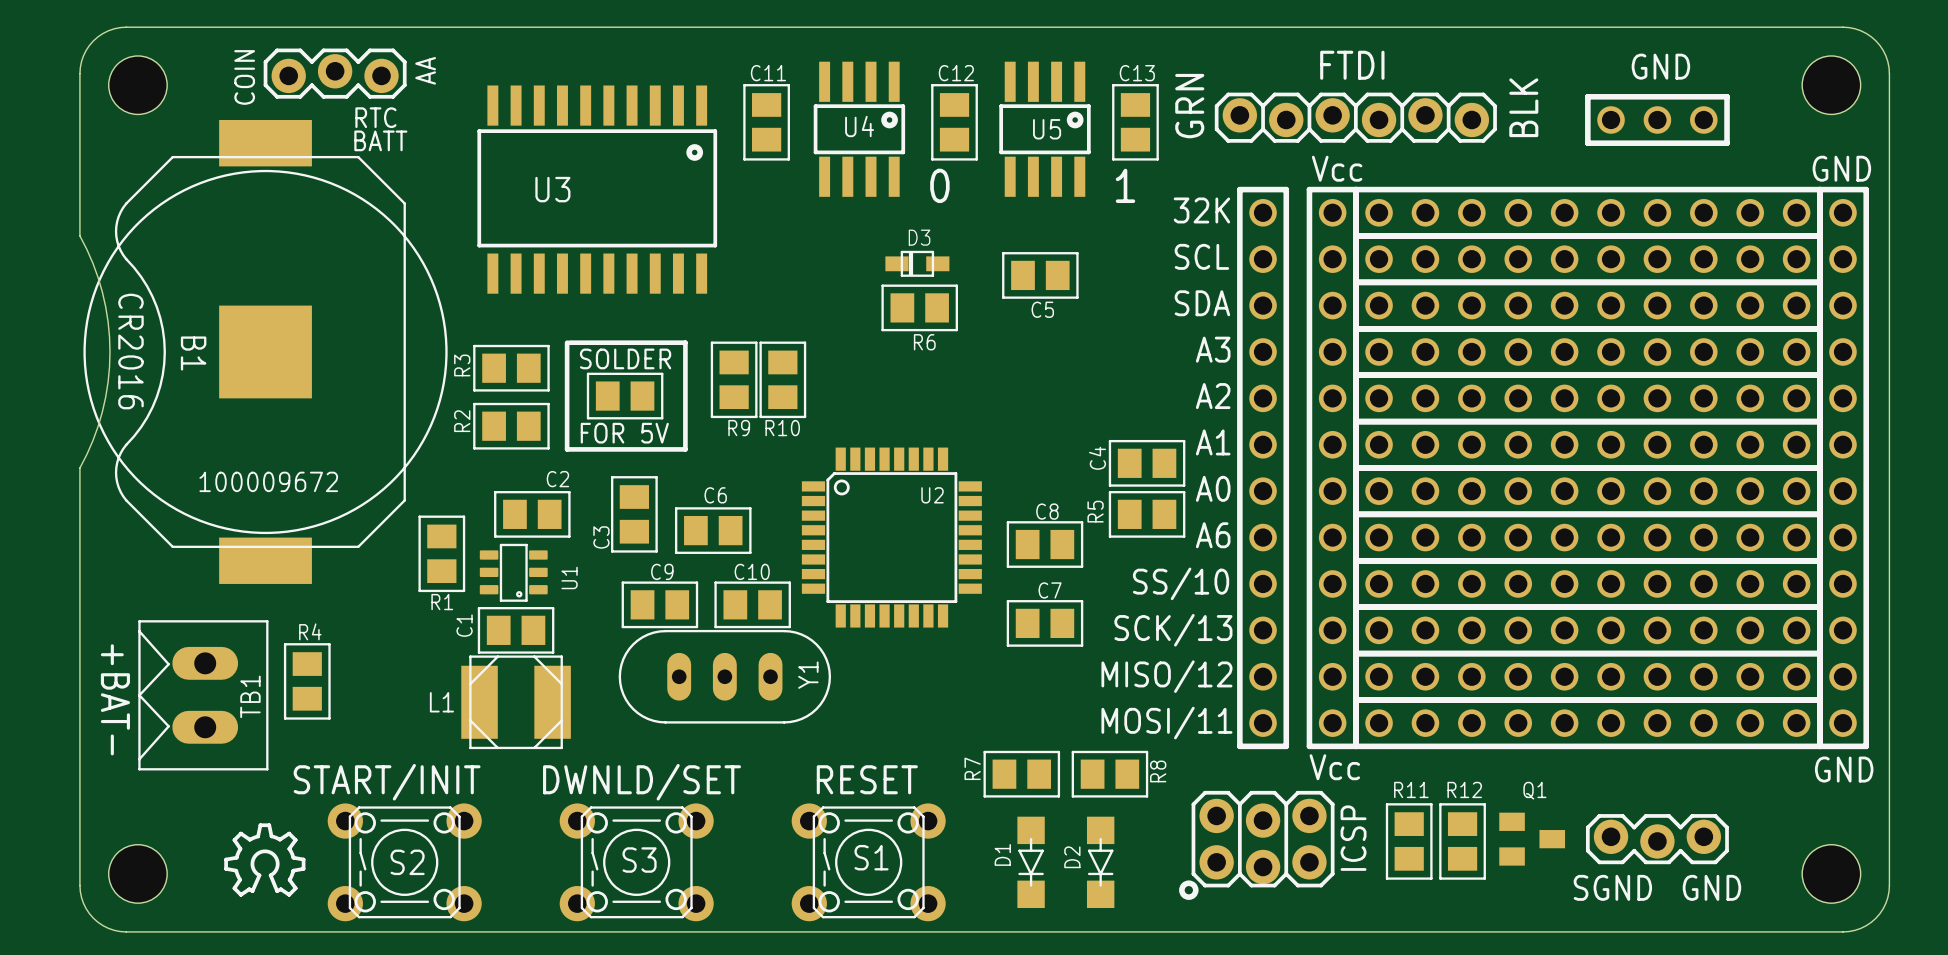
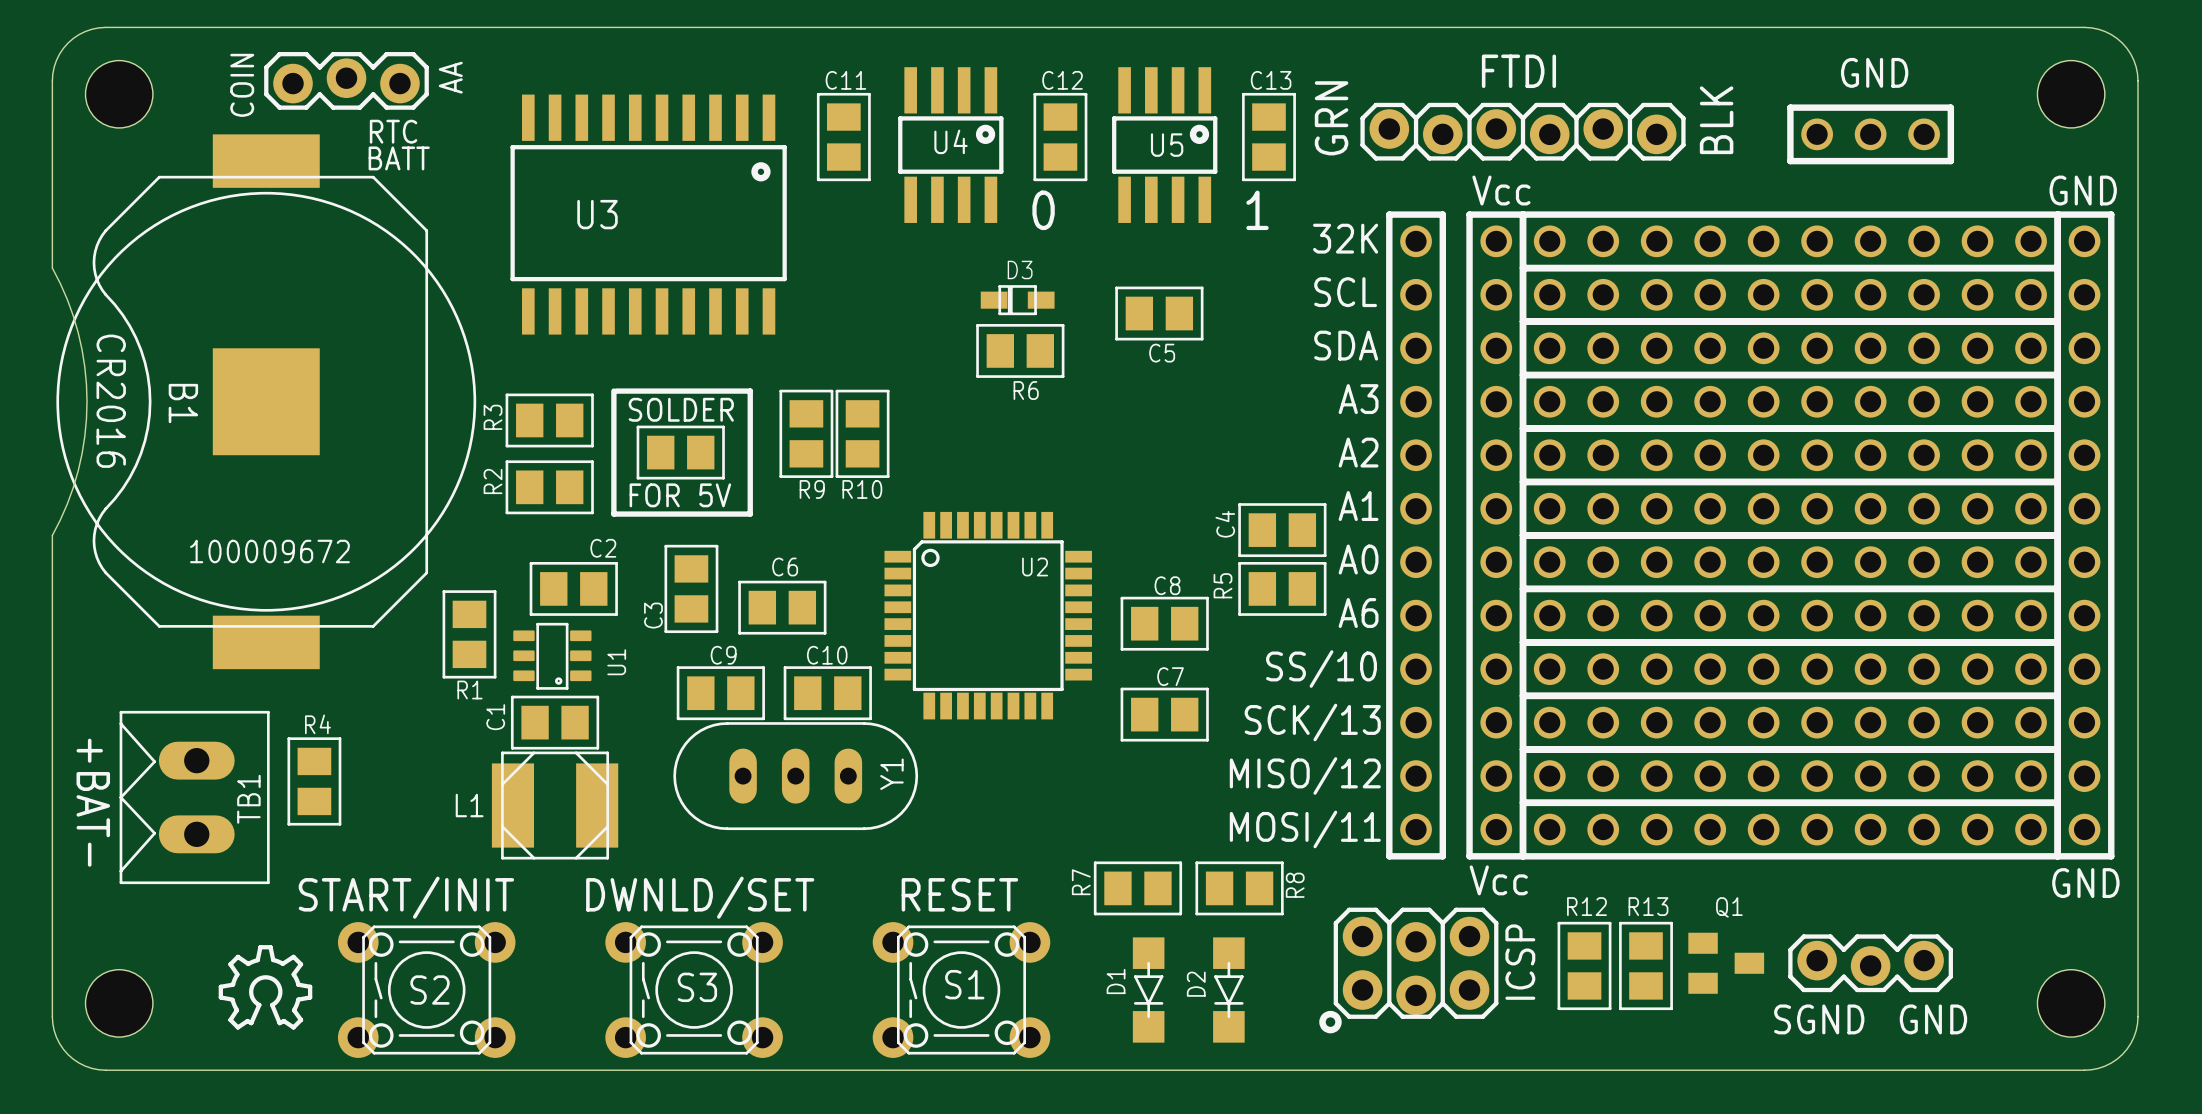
R11 name: R11 (1411, 789) -> R12 (1586, 906)
R12 name: R12 (1464, 789) -> R13 (1648, 906)

